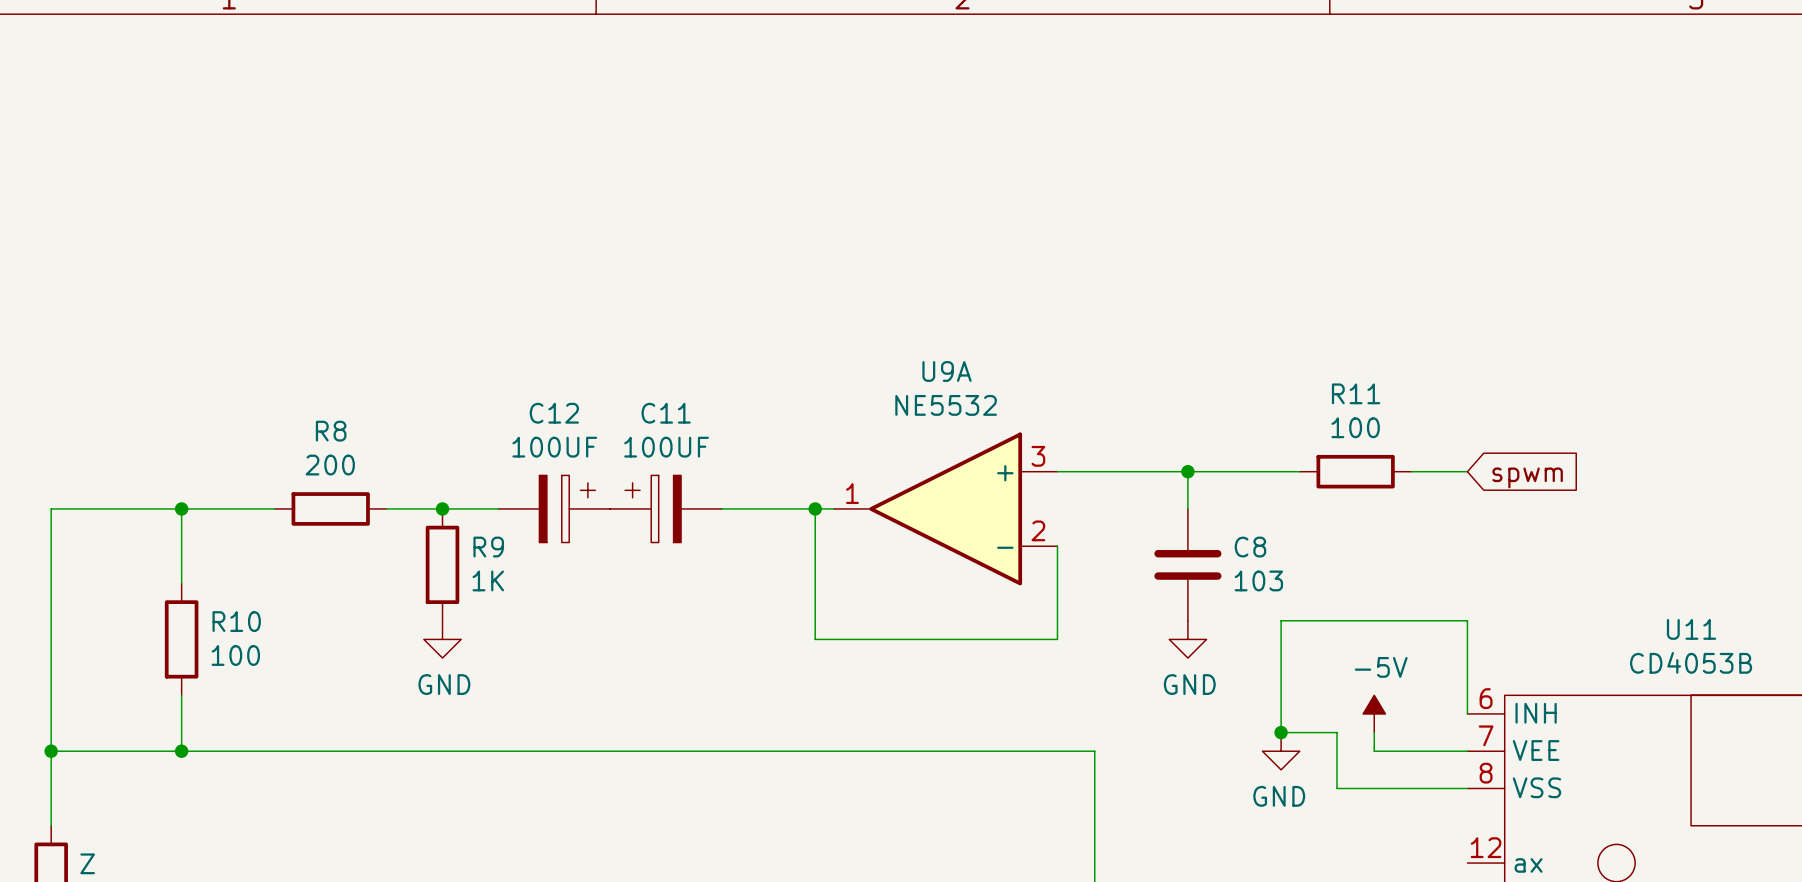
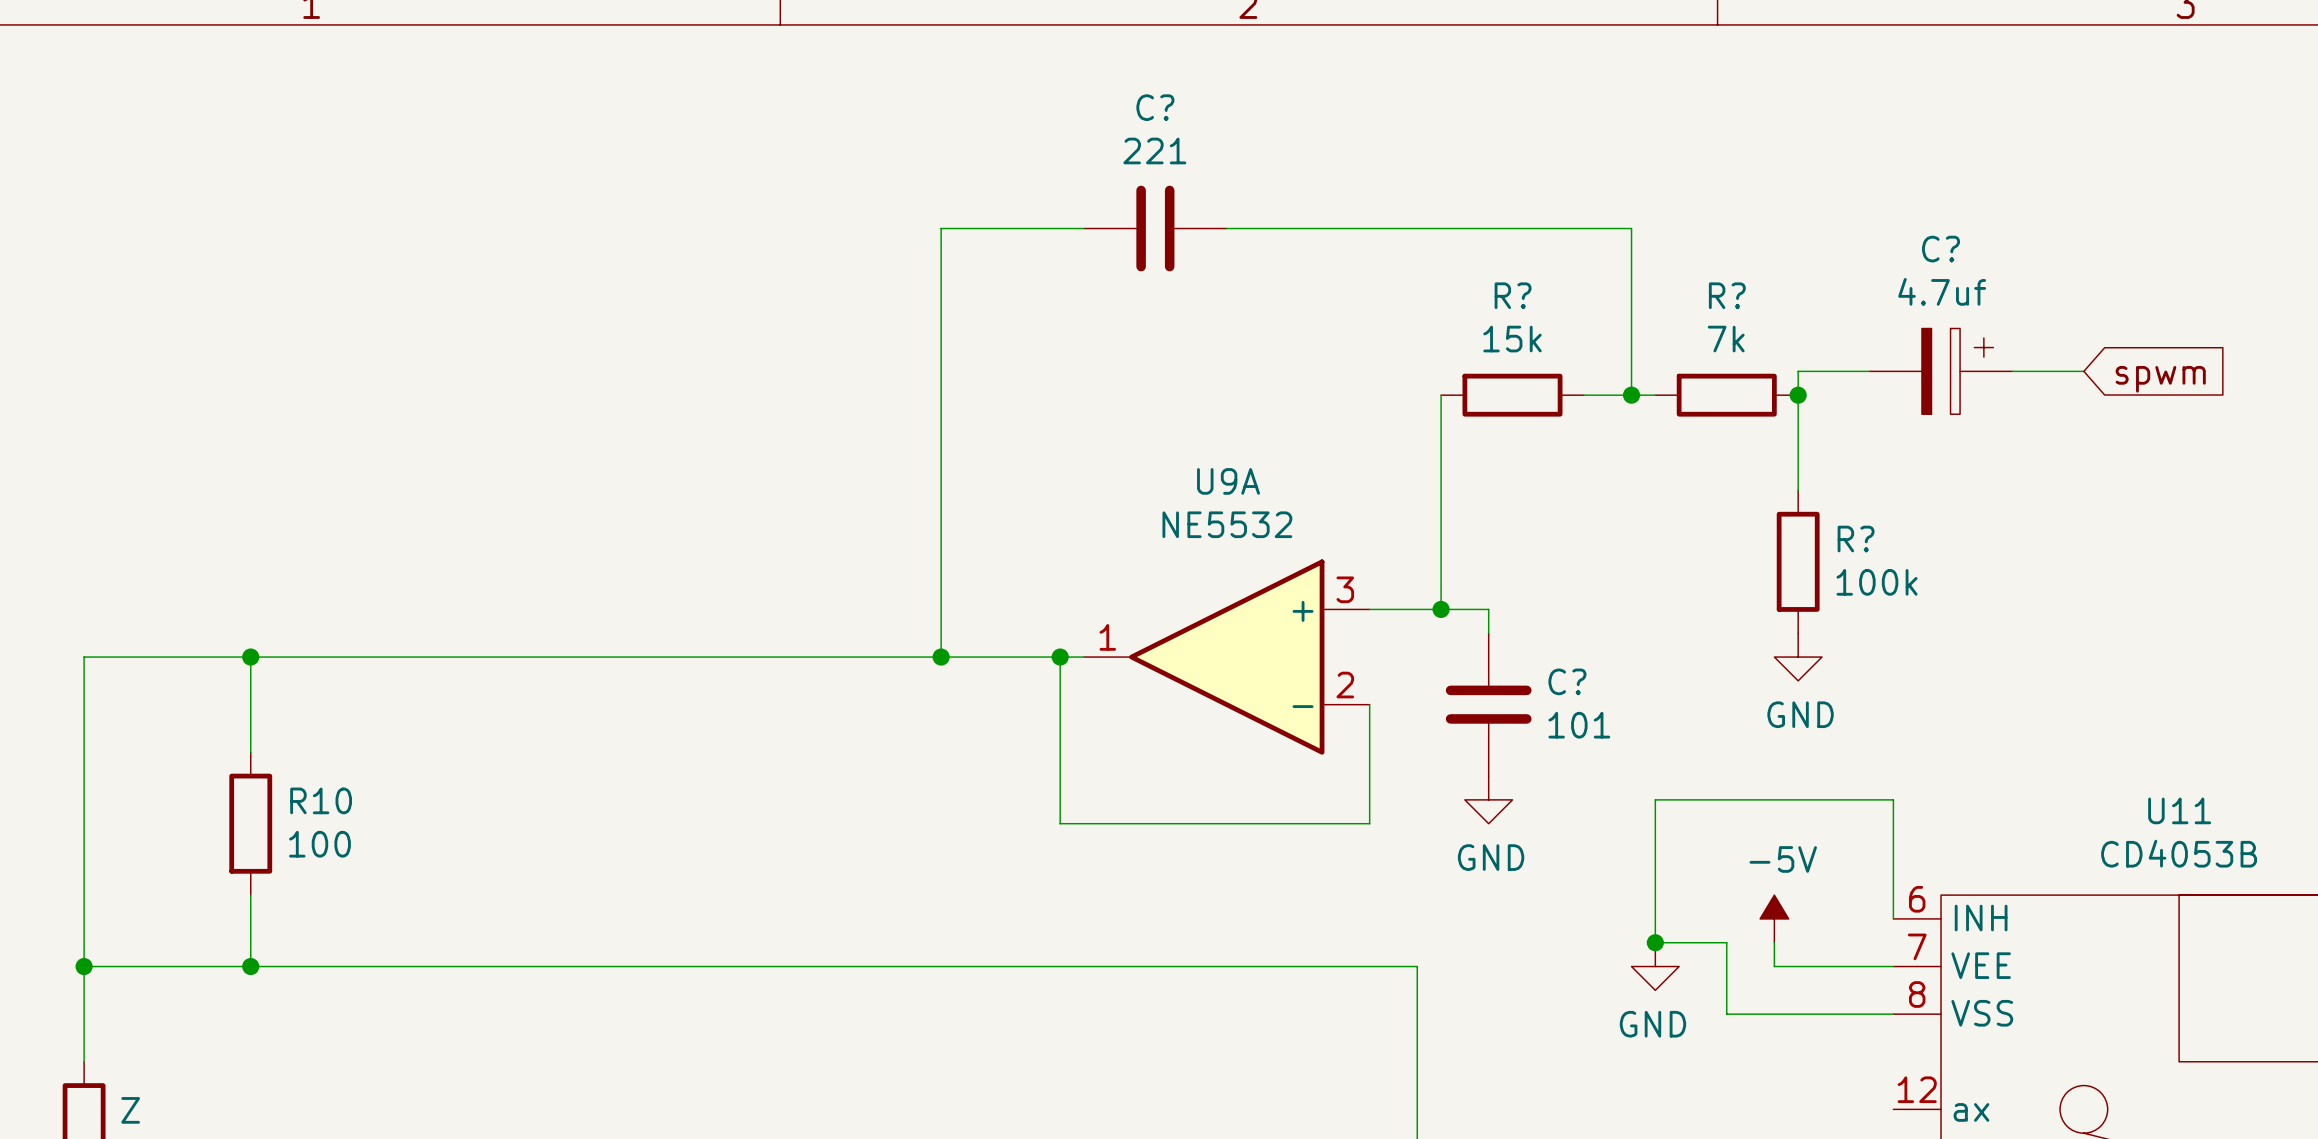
wire: none -> (1083, 228) (941, 228) (941, 657) (655, 657)
C?: none -> 221 (1155, 228)
wire: none -> (1226, 228) (1631, 228) (1631, 395)
wire: none -> (1869, 371) (1798, 371) (1798, 490)
C?: none -> 4.7uf (1941, 371)
wire: none -> (1441, 395) (1441, 609)
R?: none -> 15k (1512, 395)
wire: none -> (1583, 395) (1655, 395)
junction: none -> (1631, 395)
R?: none -> 7k (1726, 395)
junction: none -> (1798, 395)
R?: none -> 100k (1798, 561)
wire: (1150, 471) (1299, 471) -> (1488, 609) (1488, 633)
wire: (1187, 471) (1187, 508) -> none
junction position: (1187, 471) -> (1441, 609)
R11: 100 (1355, 471) -> none
wire: (1411, 471) (1467, 471) -> (2012, 371) (2083, 371)
global label position: spwm (1527, 477) -> spwm (2160, 379)
wire: none -> (369, 657) (512, 657)
R8: 200 (330, 508) -> none
junction: (442, 508) -> none
C12: 100UF (554, 508) -> none
C11: 100UF (666, 508) -> none
junction: none -> (941, 657)
power symbol: none -> GND (1798, 657)
C?: none -> 101 (1488, 704)
R9: 1K (442, 564) -> none
C8: 103 (1187, 564) -> none
power symbol: GND (442, 639) -> none
power symbol position: GND (1187, 639) -> GND (1488, 799)

